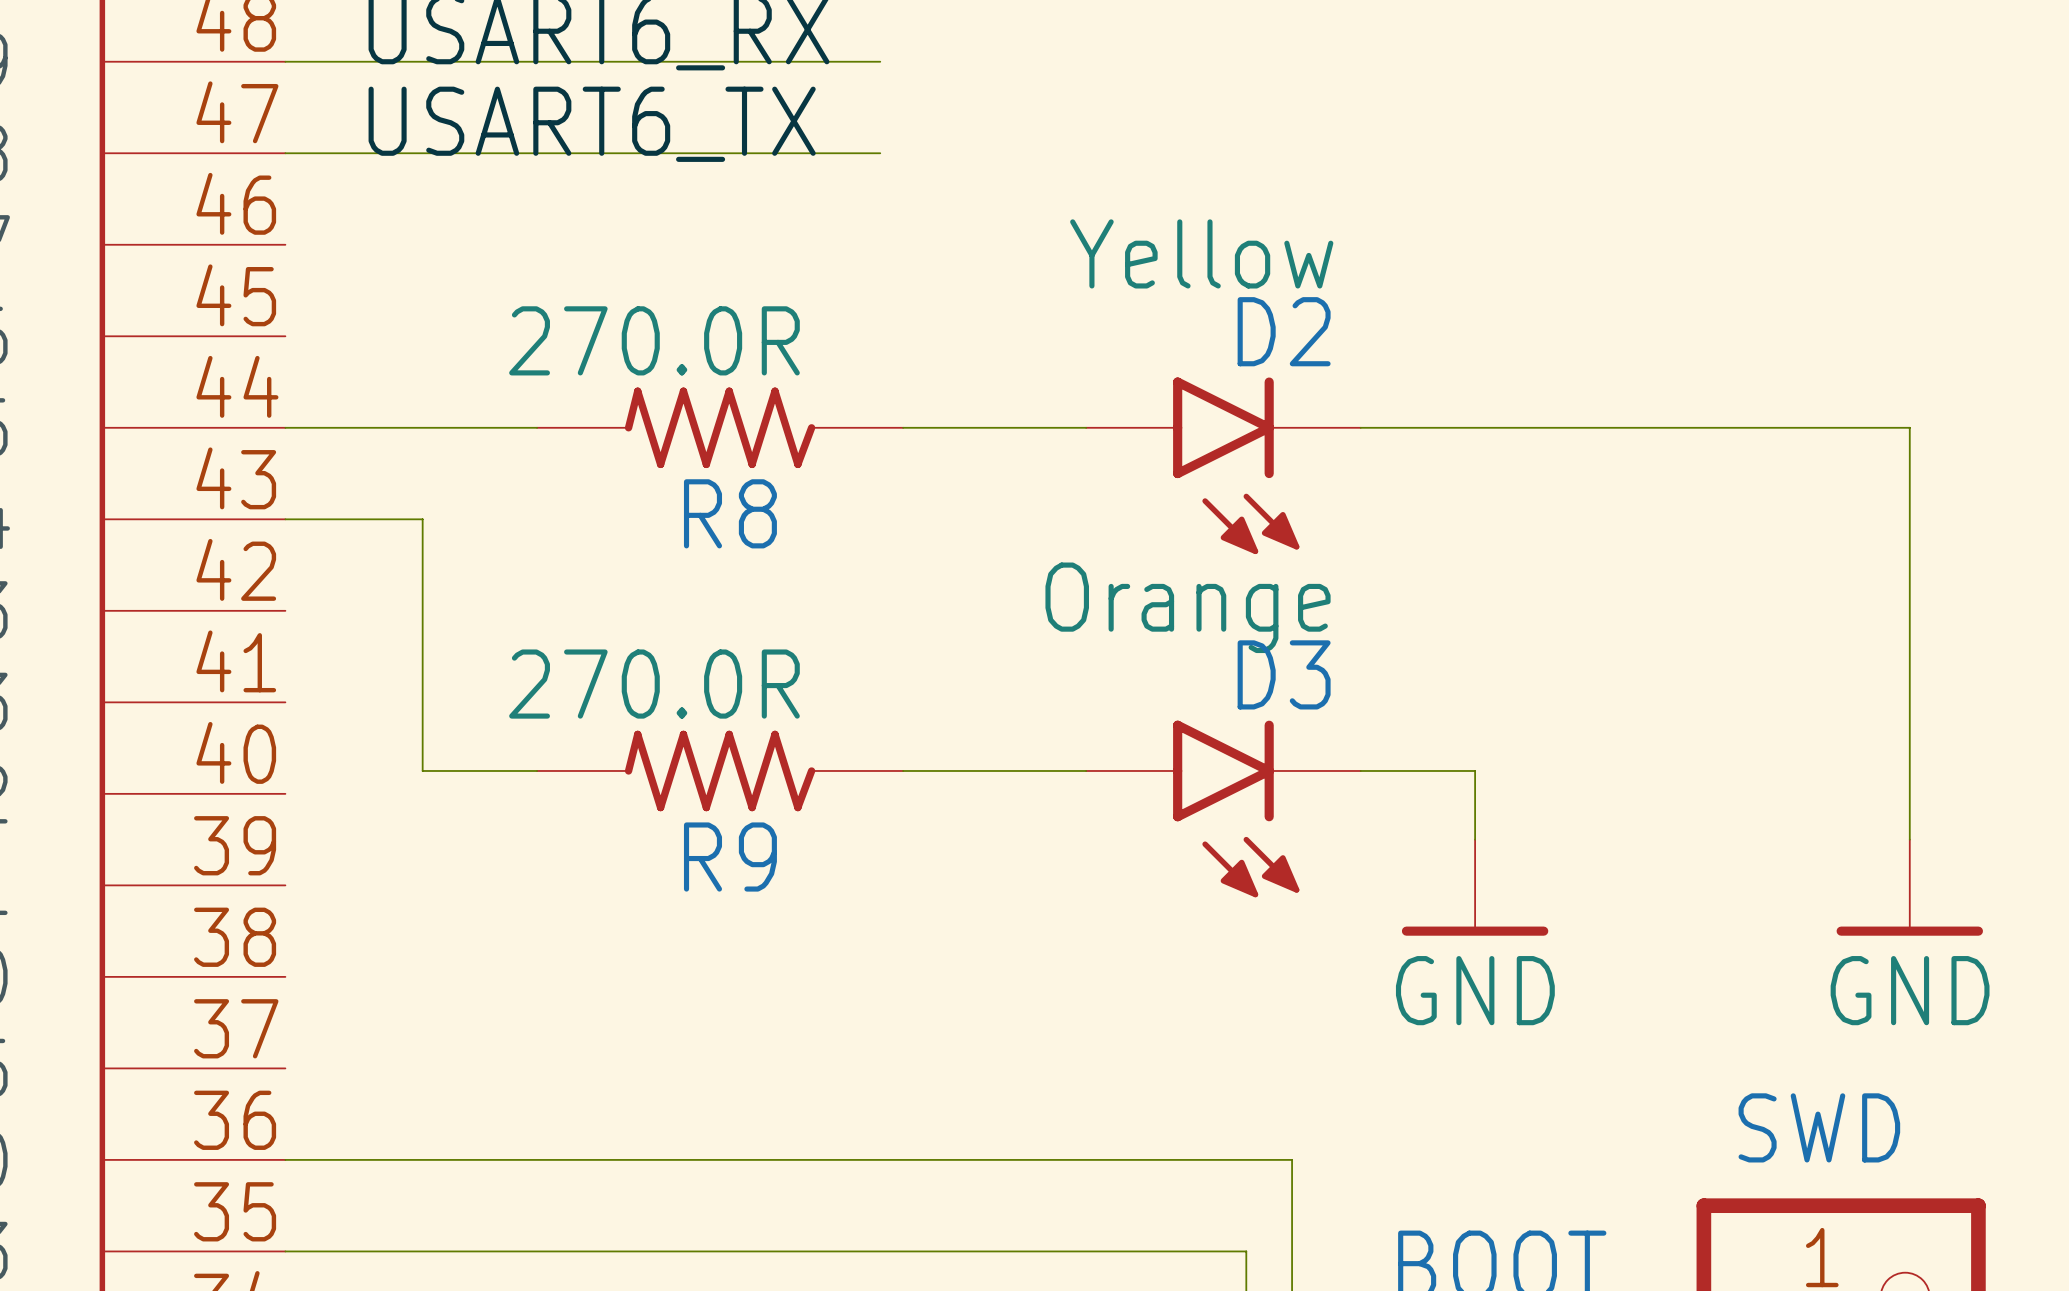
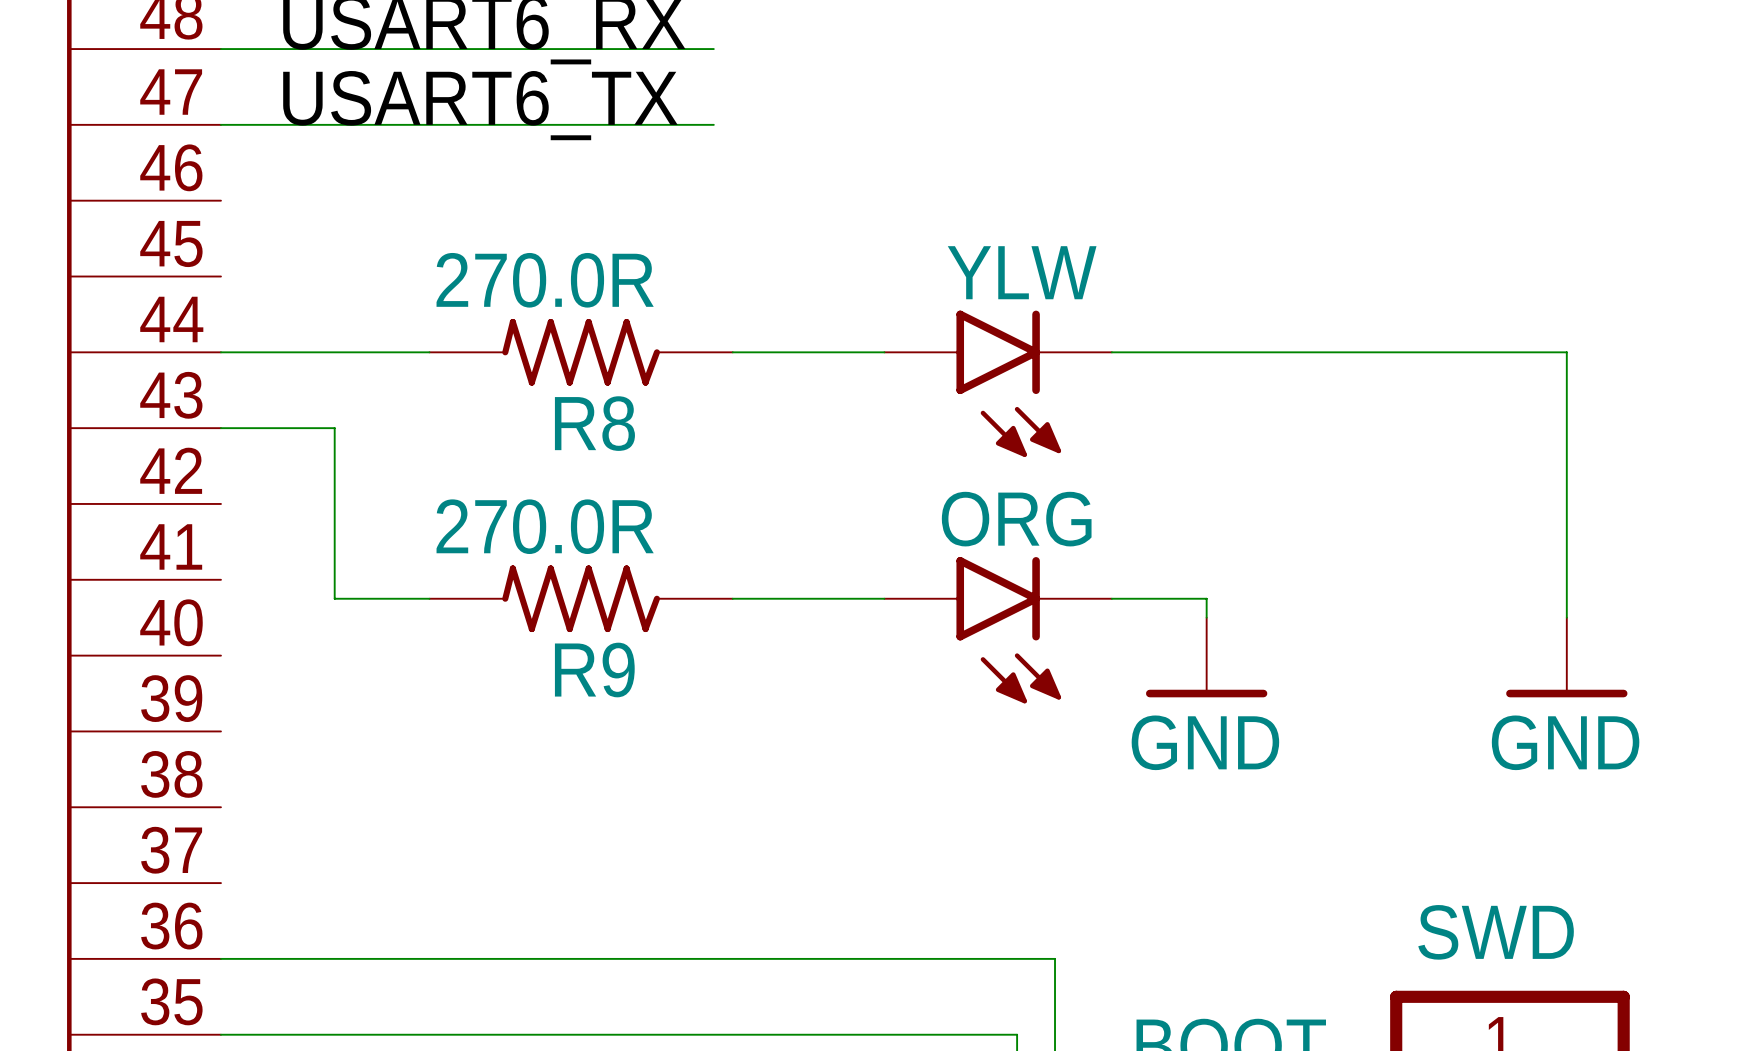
D2 value: Yellow (1201, 253) -> none
D2 name: D2 (1284, 331) -> YLW (1022, 272)
wire: (422, 725) (422, 770) (537, 770) -> (334, 598) (429, 598)
wire: none -> (1111, 598) (1206, 598) (1206, 617)
ORG: none -> (998, 630)
R9 position: (720, 770) -> (581, 598)
wire: (903, 770) (1086, 770) -> (732, 598) (884, 598)
wire: (1360, 770) (1475, 770) (1475, 839) -> none
D3: Orange (1223, 808) -> none
power symbol position: GND (1475, 887) -> GND (1206, 657)
power symbol position: GND (1909, 887) -> GND (1566, 657)

